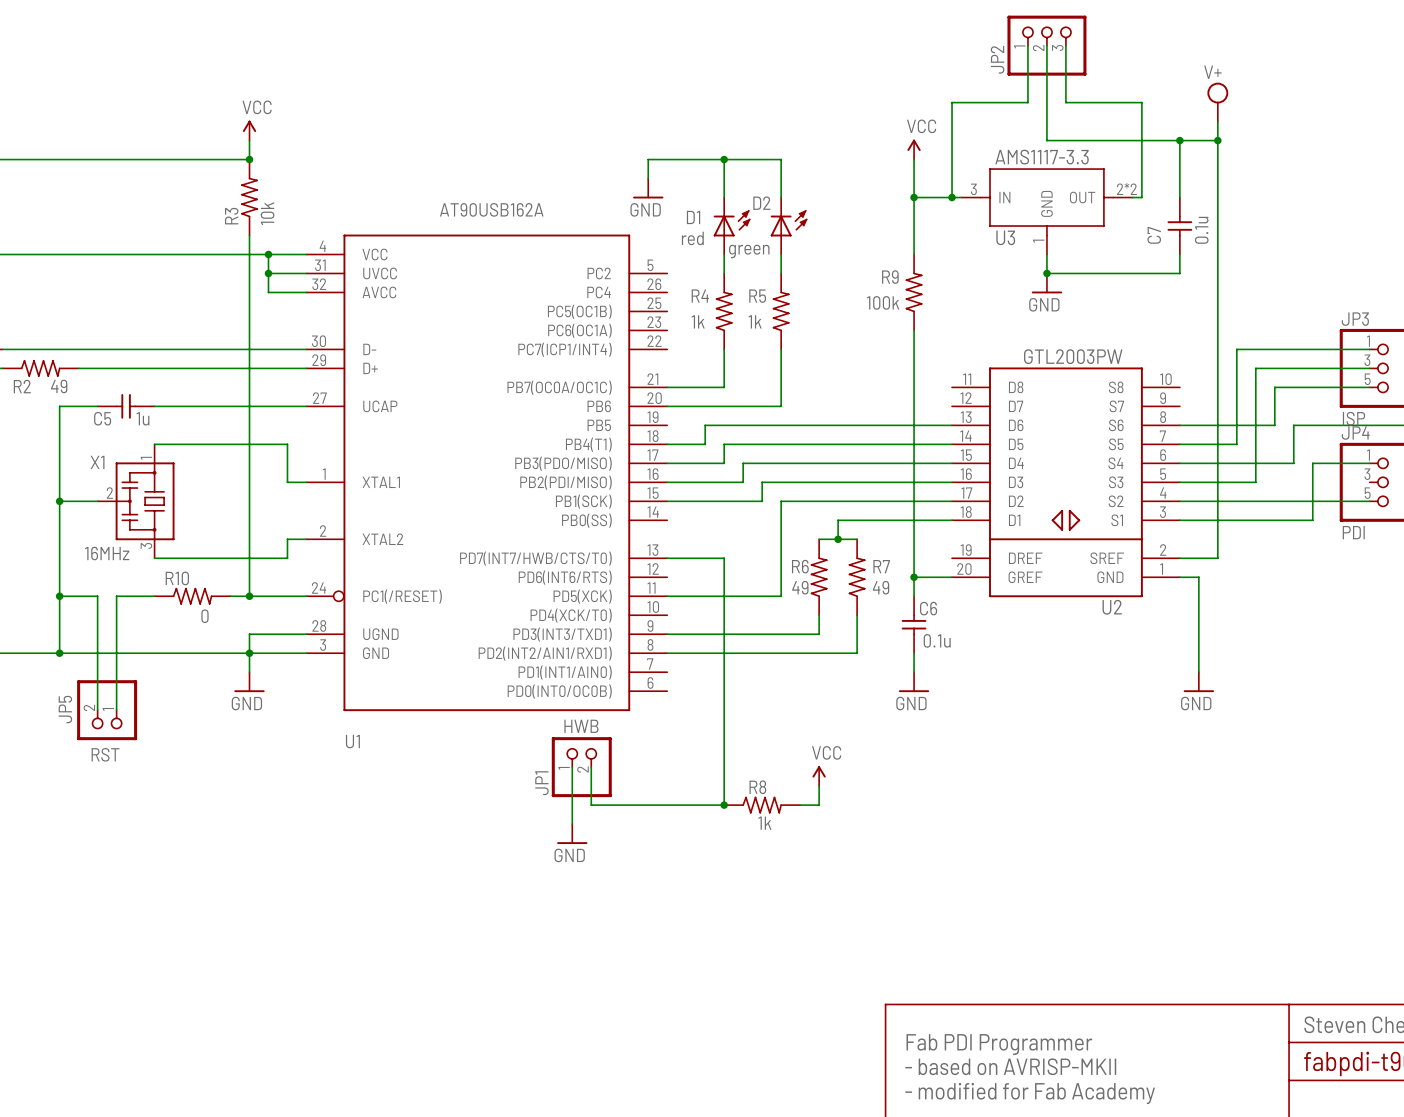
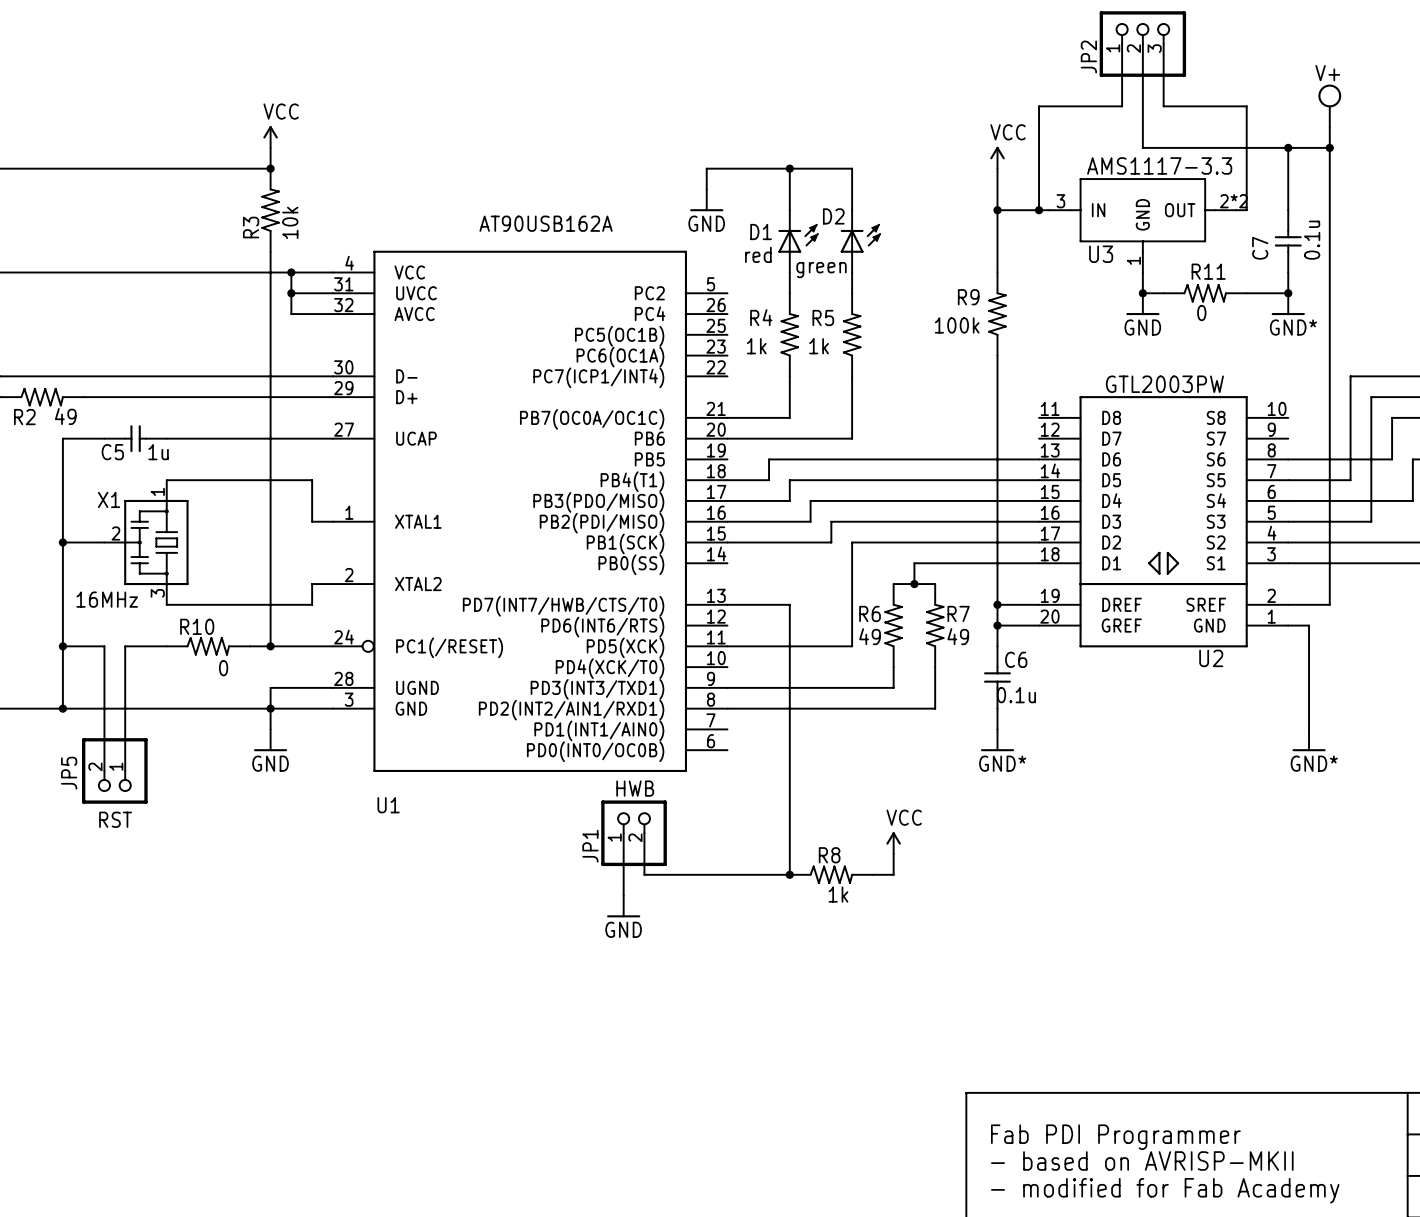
R11: none -> 0 (1205, 293)
junction: none -> (1288, 293)
power symbol: none -> GND* (1288, 304)
wire: none -> (997, 604) (1039, 604)
junction: none -> (997, 604)
power symbol: GND (914, 682) -> GND* (997, 740)
power symbol: GND (1198, 682) -> GND* (1309, 740)

